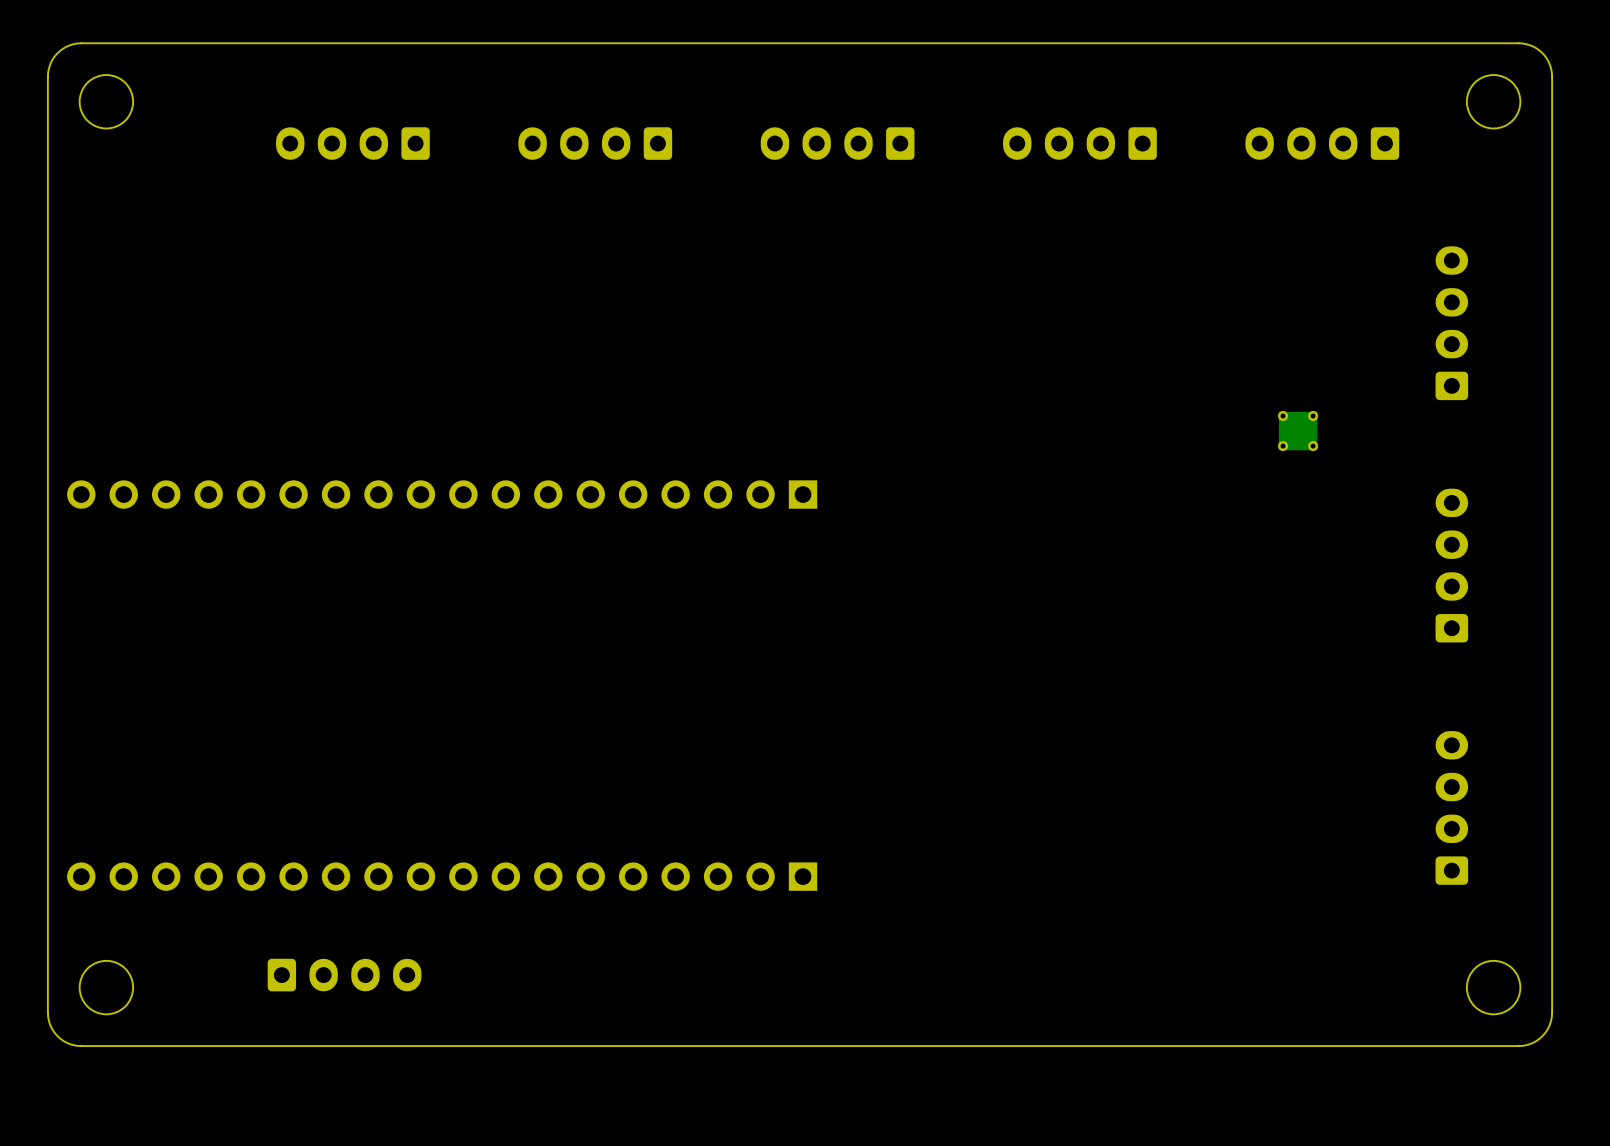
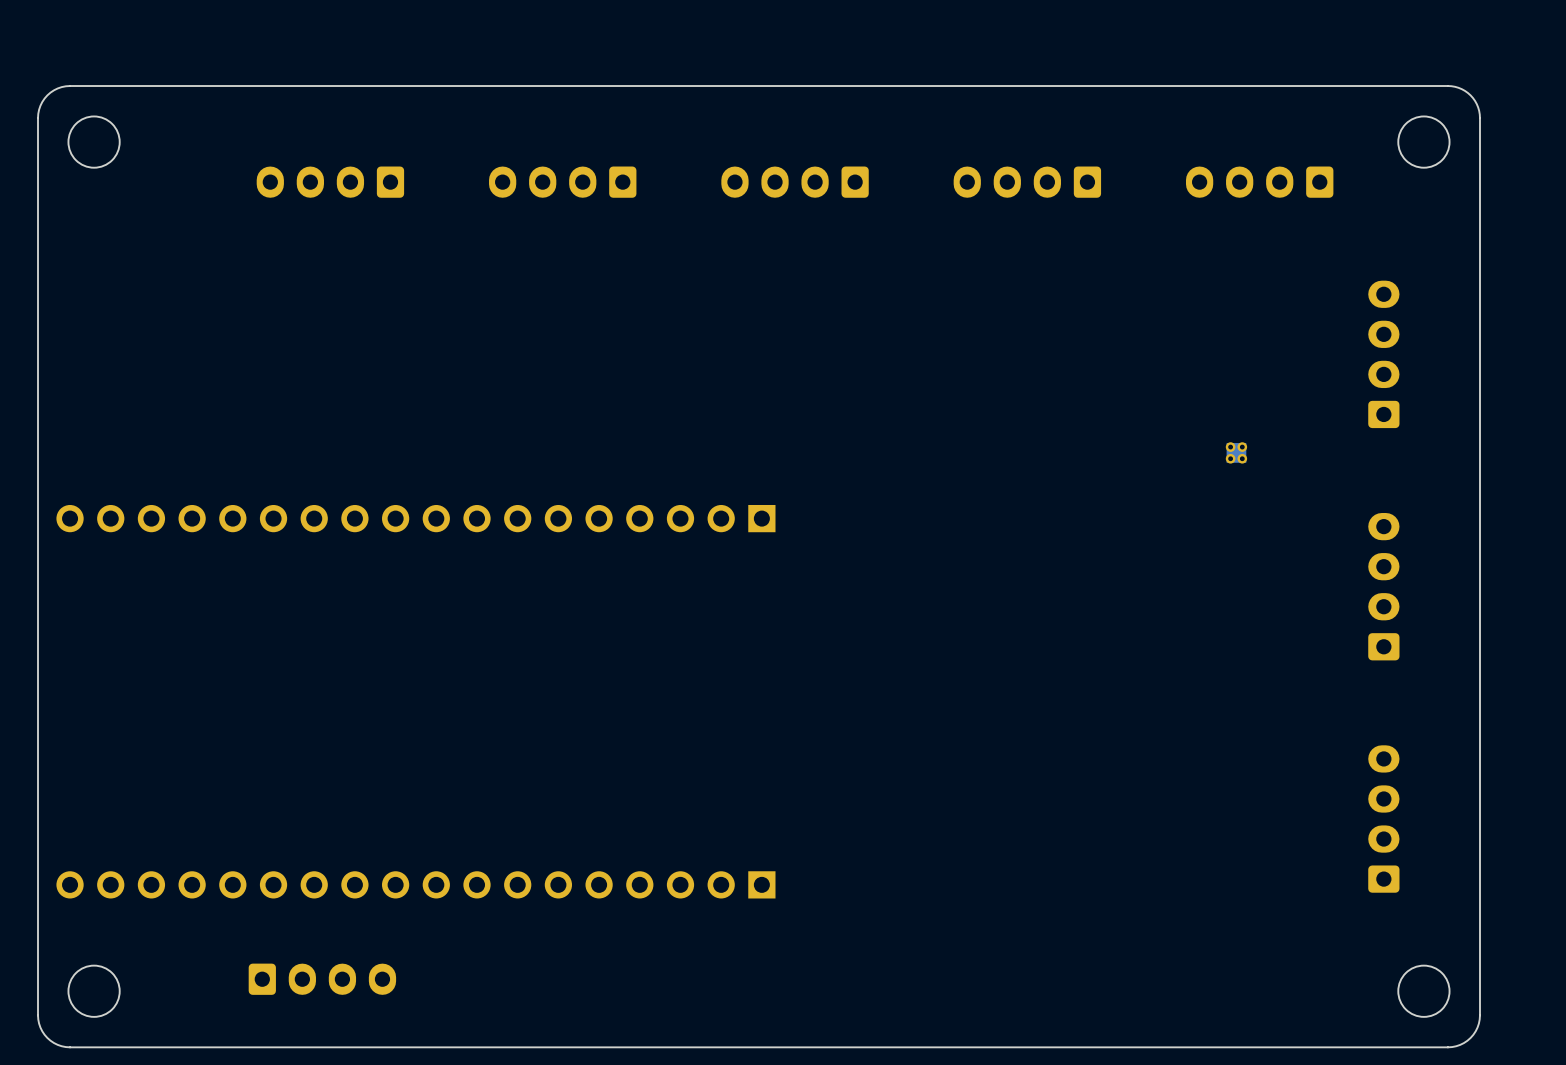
part footprint: [1278, 410, 1319, 452] -> [1225, 442, 1248, 464]

